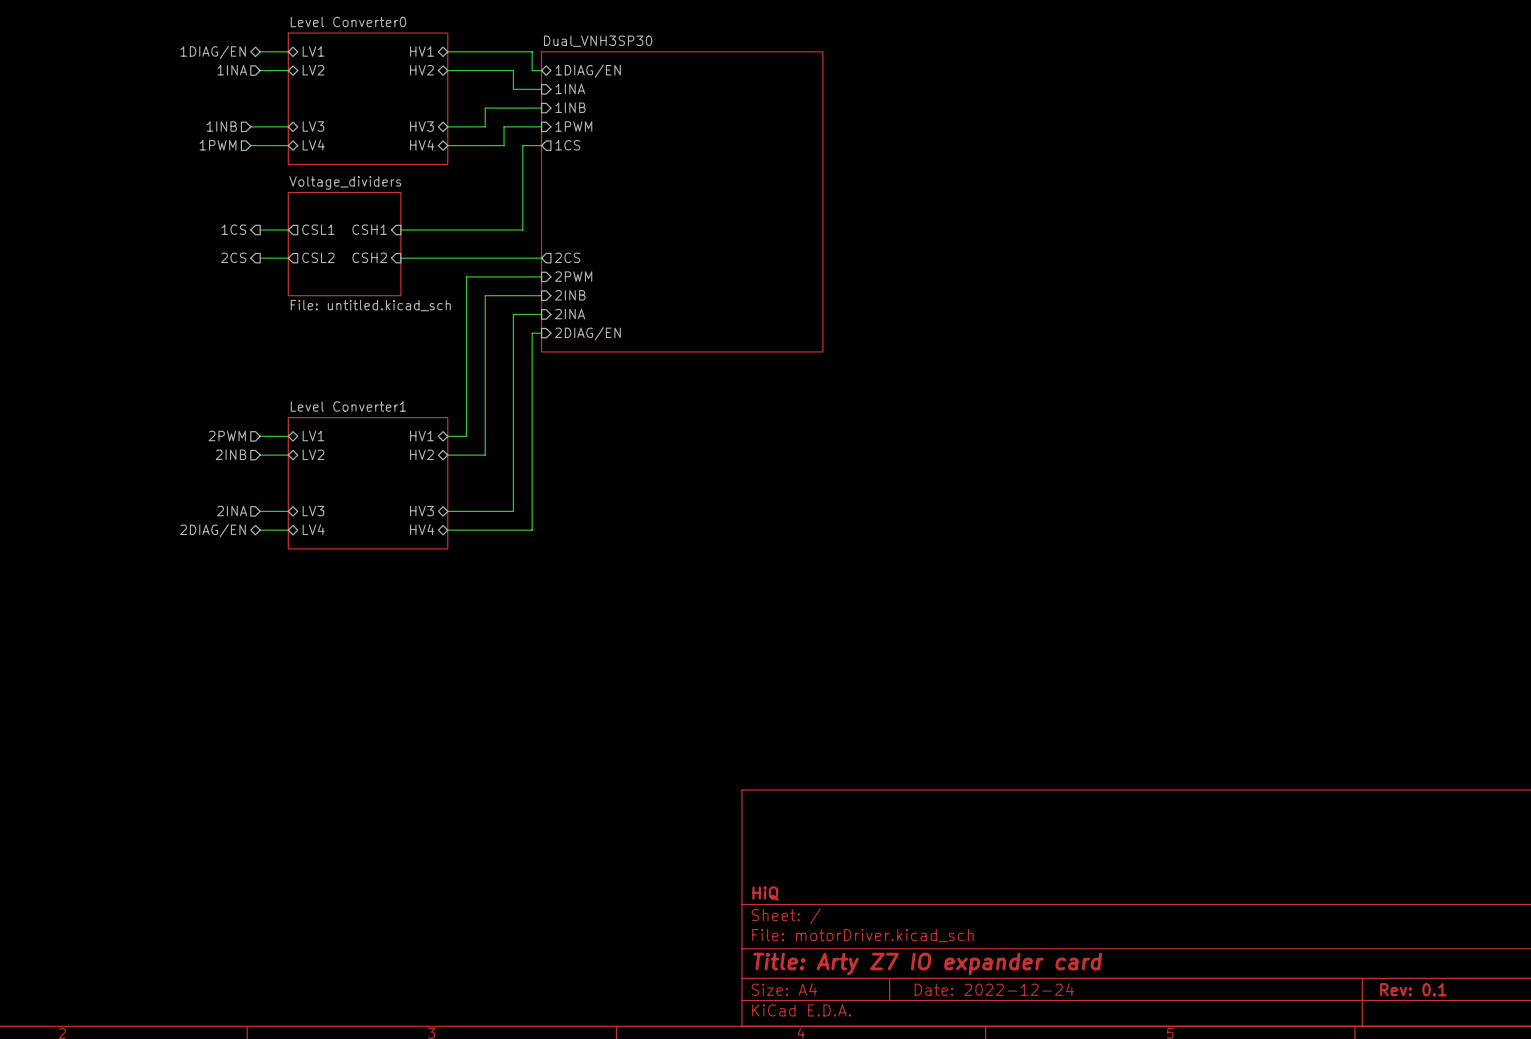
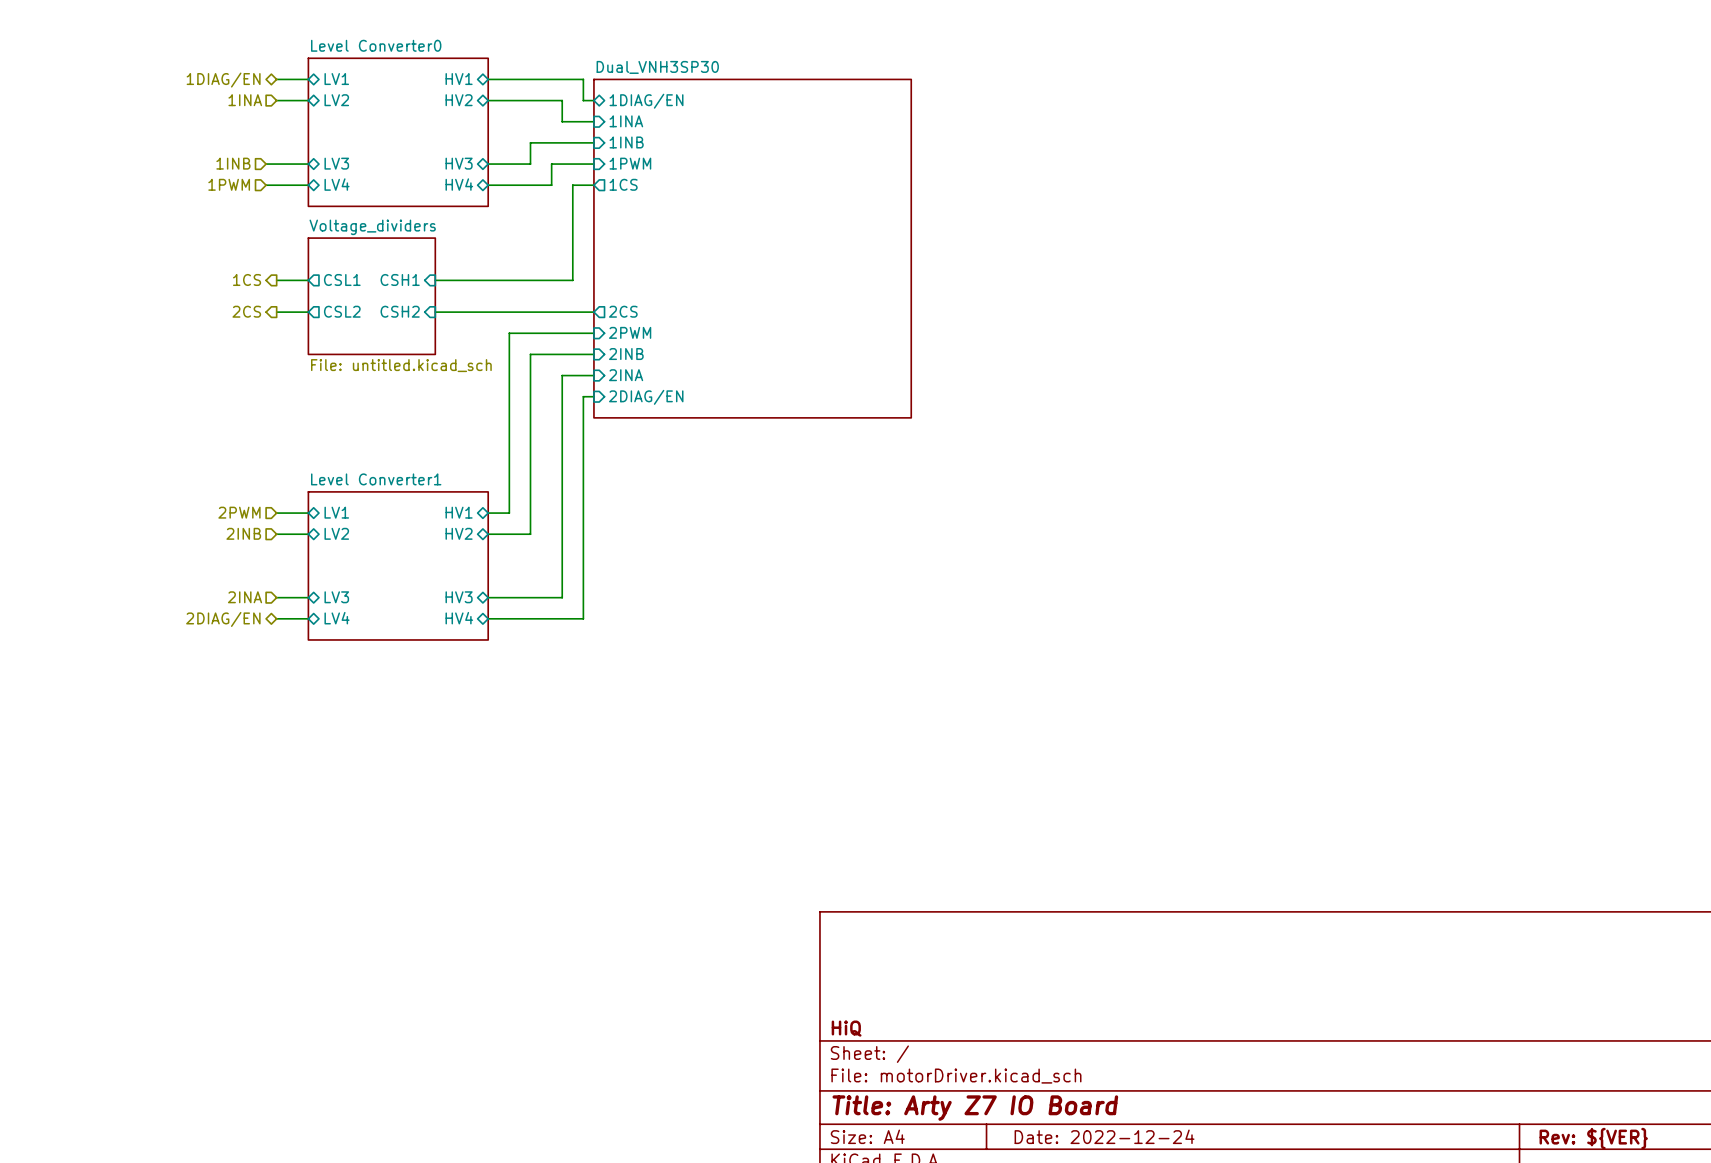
title block: Title: Arty Z7 IO expander card (927, 964) -> Title: Arty Z7 IO Board (975, 1108)
title block: Rev: 0.1 (1413, 989) -> Rev: ${VER} (1593, 1138)

